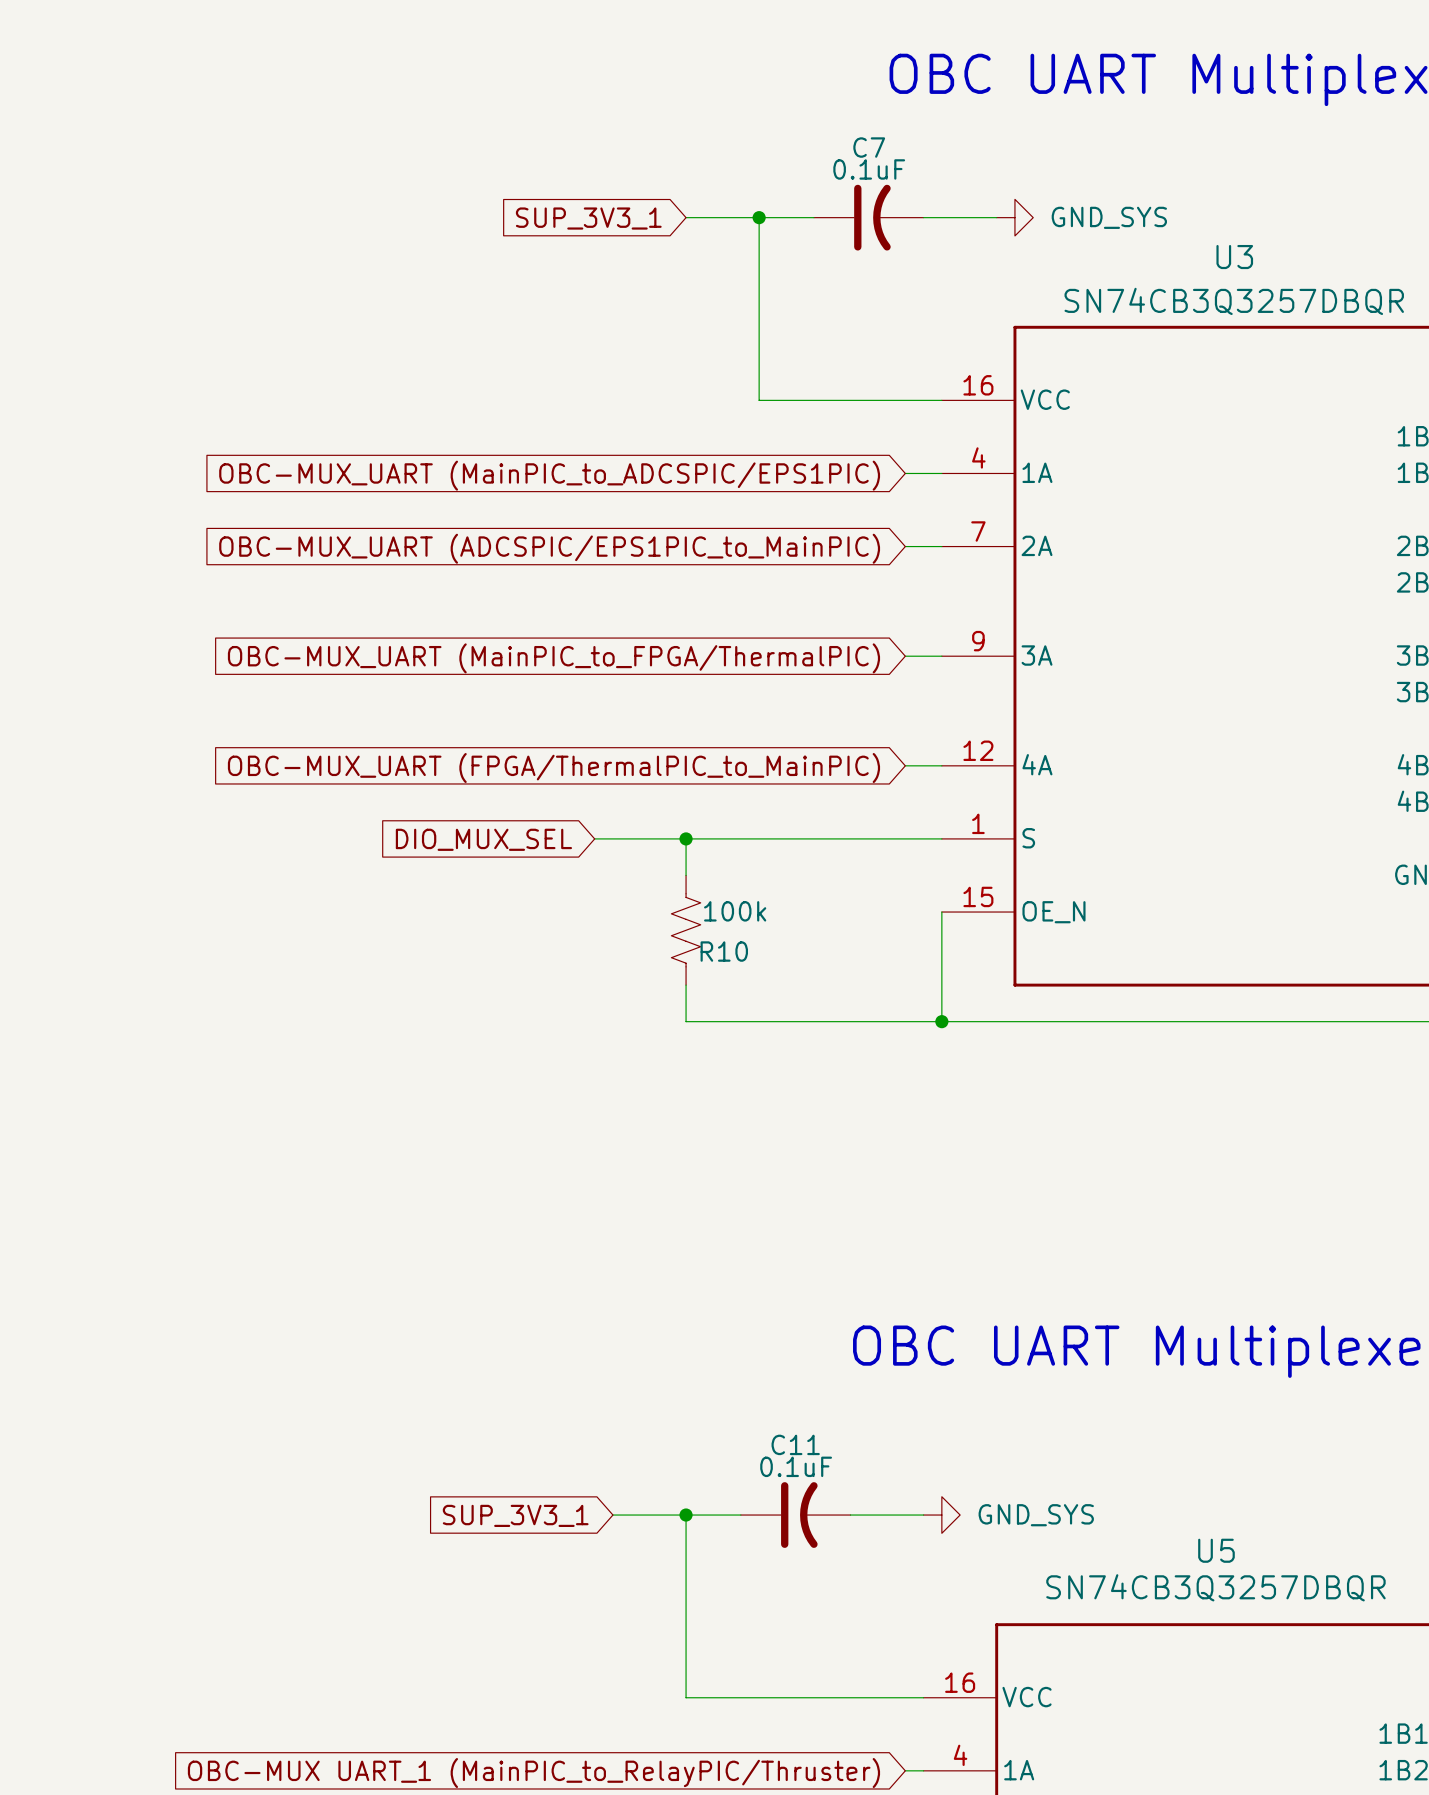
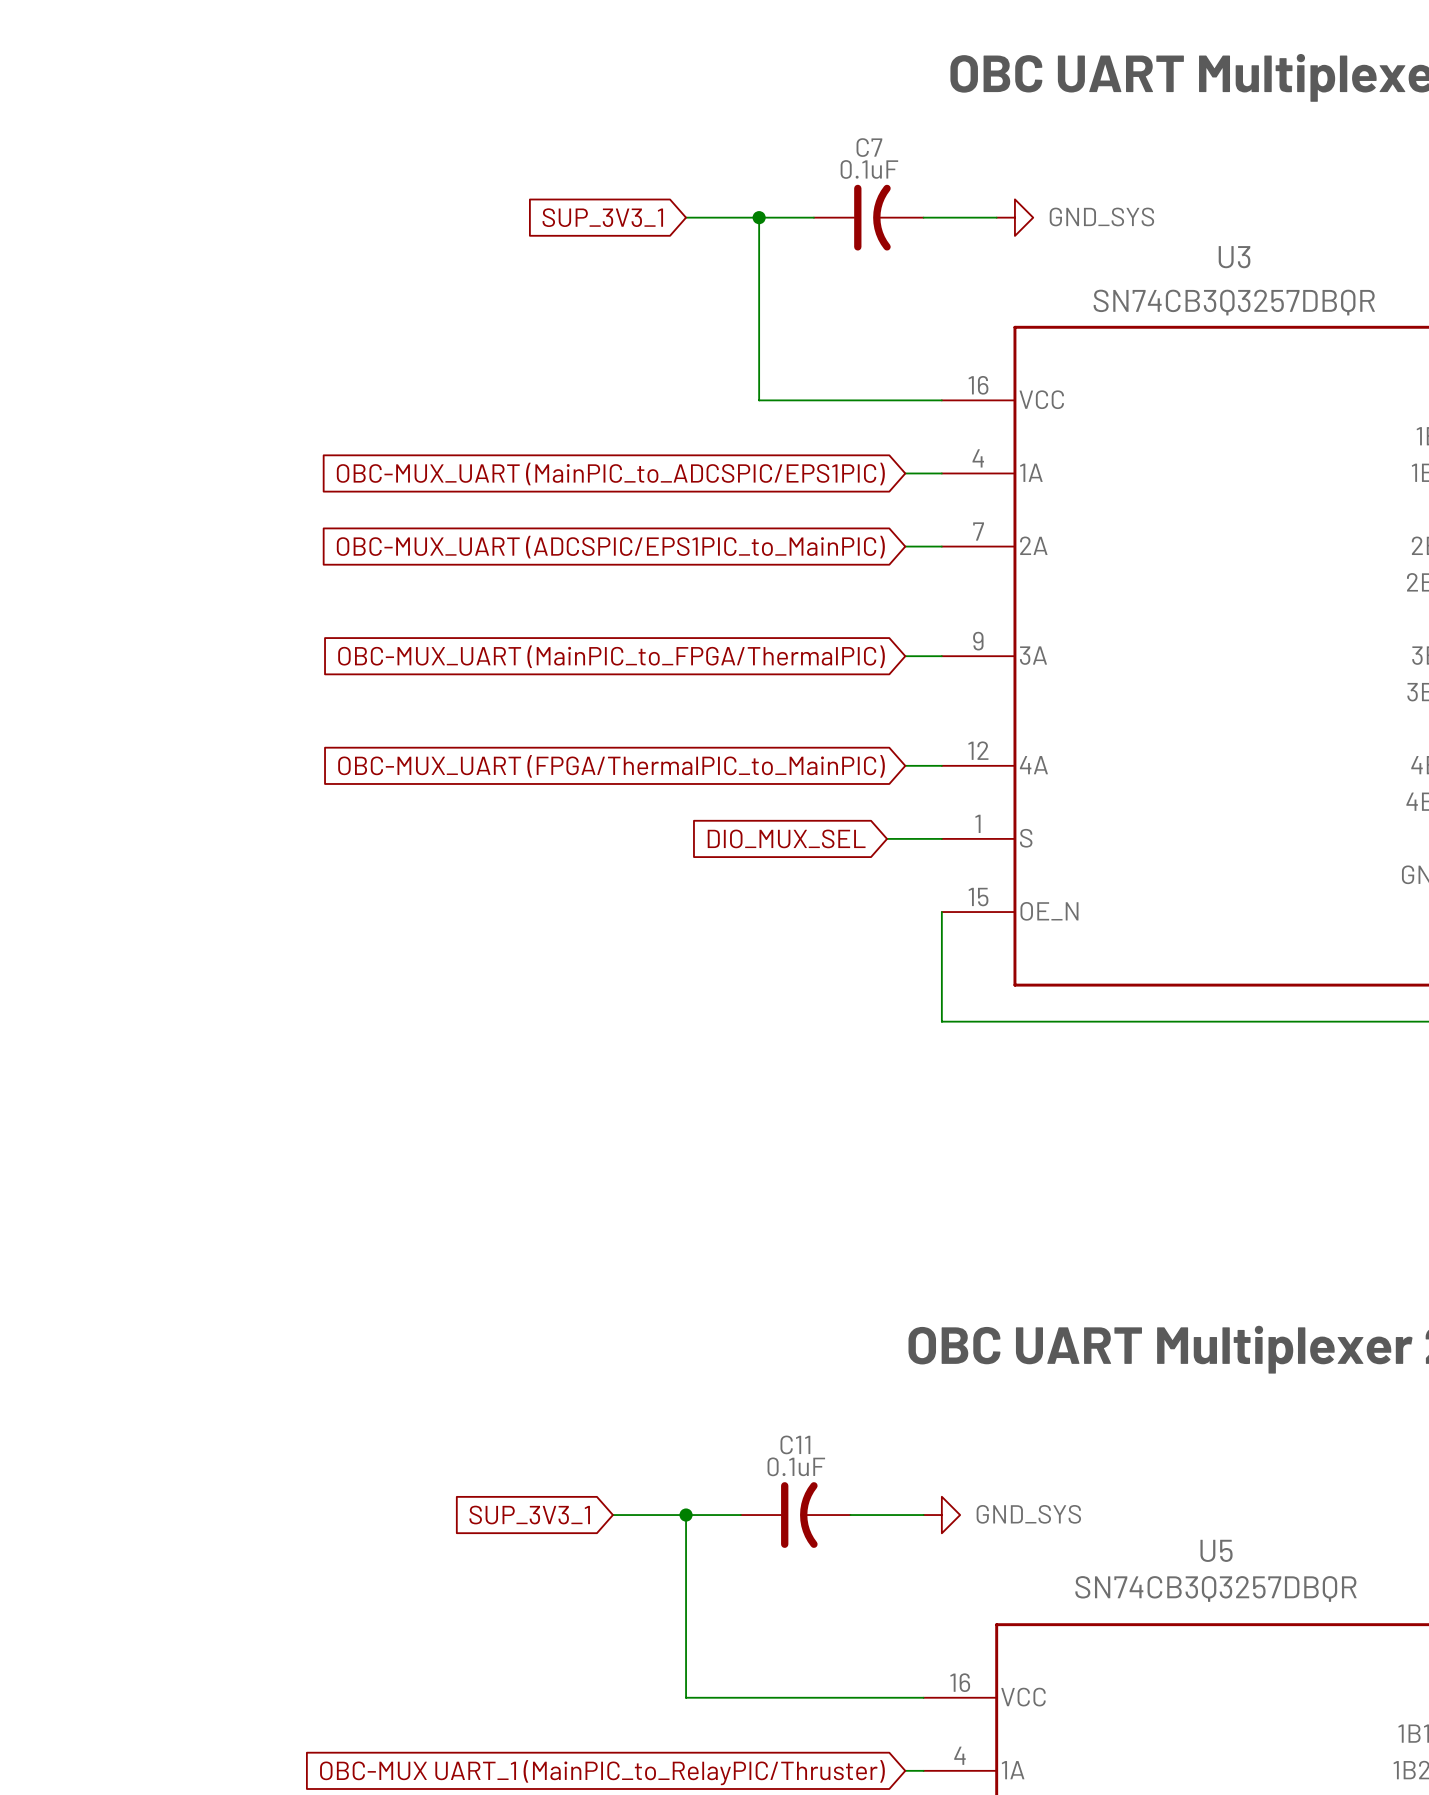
wire: (594, 838) (887, 838) -> none
wire: (686, 838) (686, 875) -> none
junction: (686, 838) -> none
global label position: DIO_MUX_SEL (483, 839) -> DIO_MUX_SEL (786, 838)
R10: 100k (686, 930) -> none
wire: (686, 985) (686, 1021) (941, 1021) -> none
junction: (941, 1021) -> none

